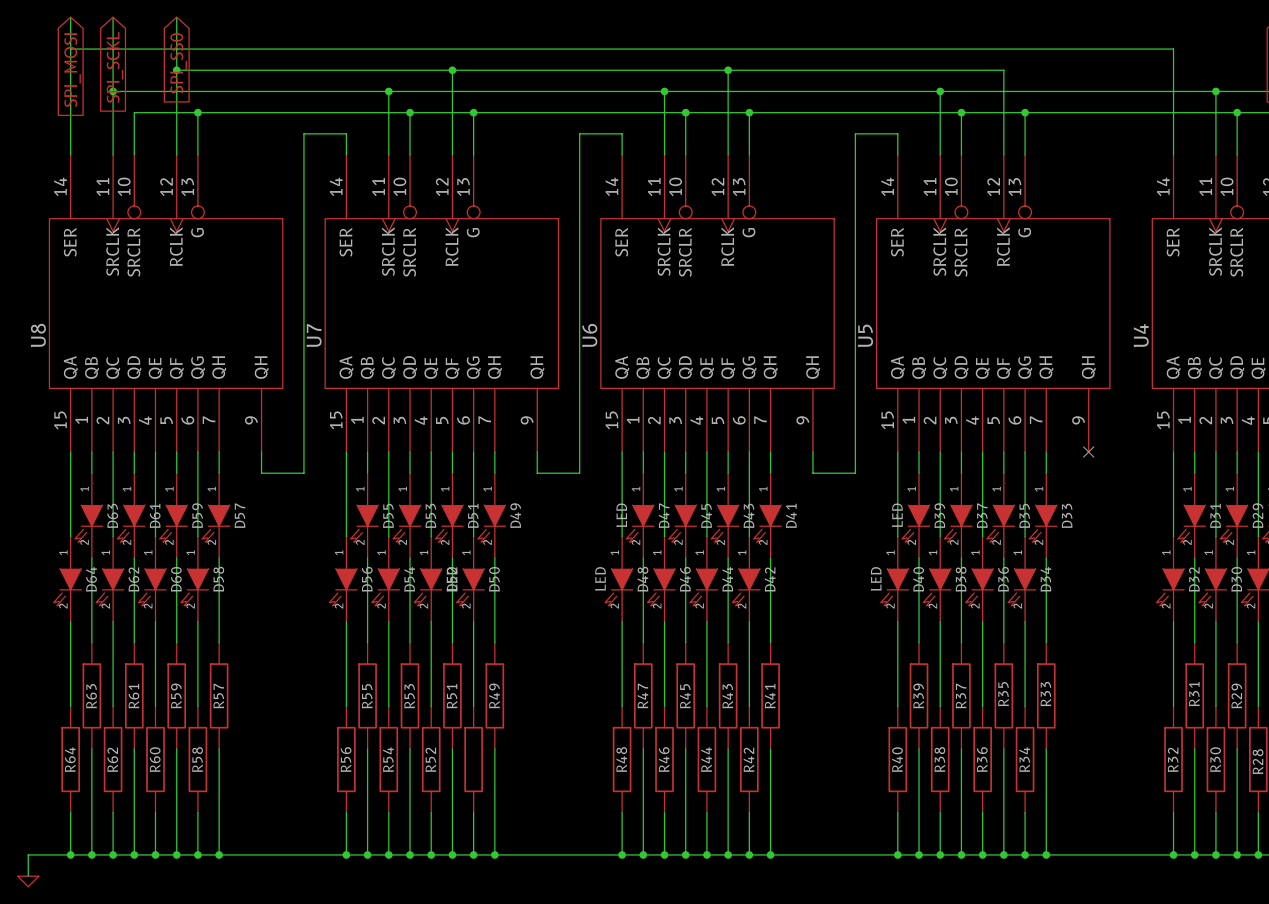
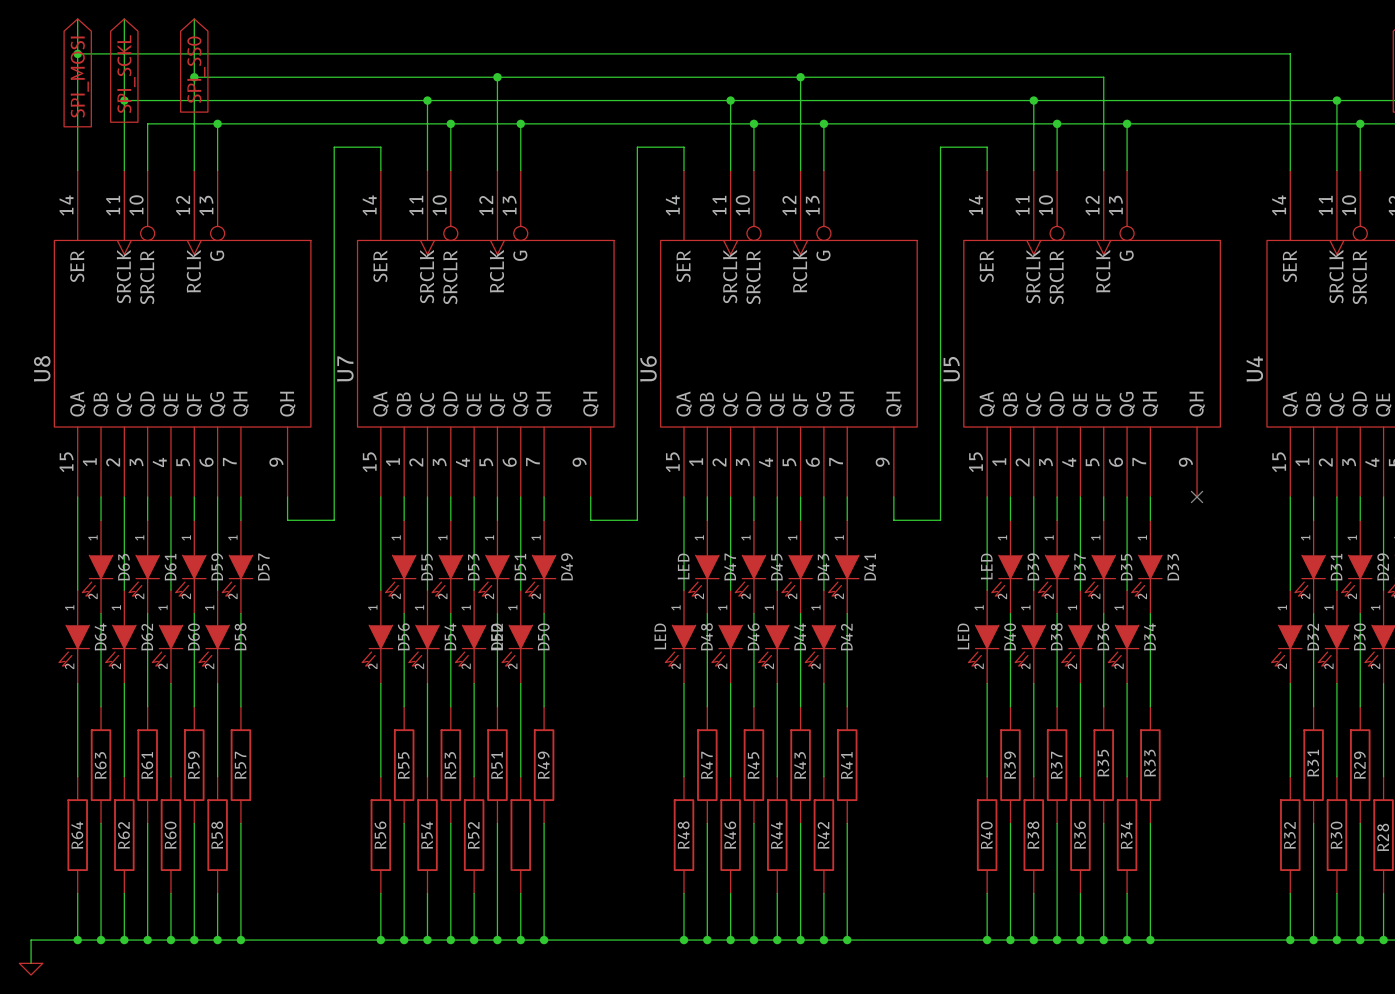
junction: none -> (77, 53)

